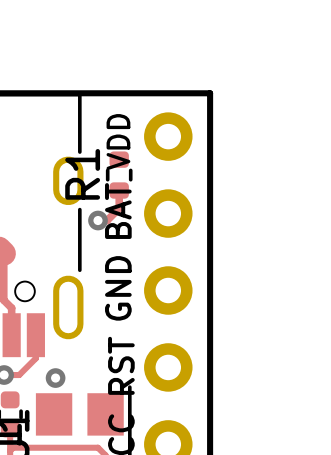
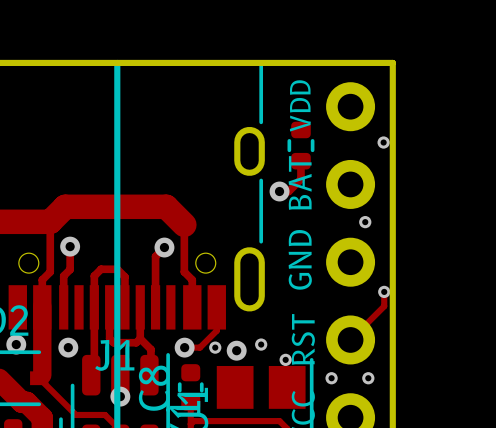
via: none -> (383, 142)
R1 name: R1 (82, 174) -> none
via: none -> (365, 222)
track: none -> (384, 291) (384, 306) (350, 339)
via: none -> (384, 291)
via: none -> (261, 344)
via: none -> (215, 347)
via: none -> (285, 359)
via: none -> (331, 378)
via: none -> (368, 378)

